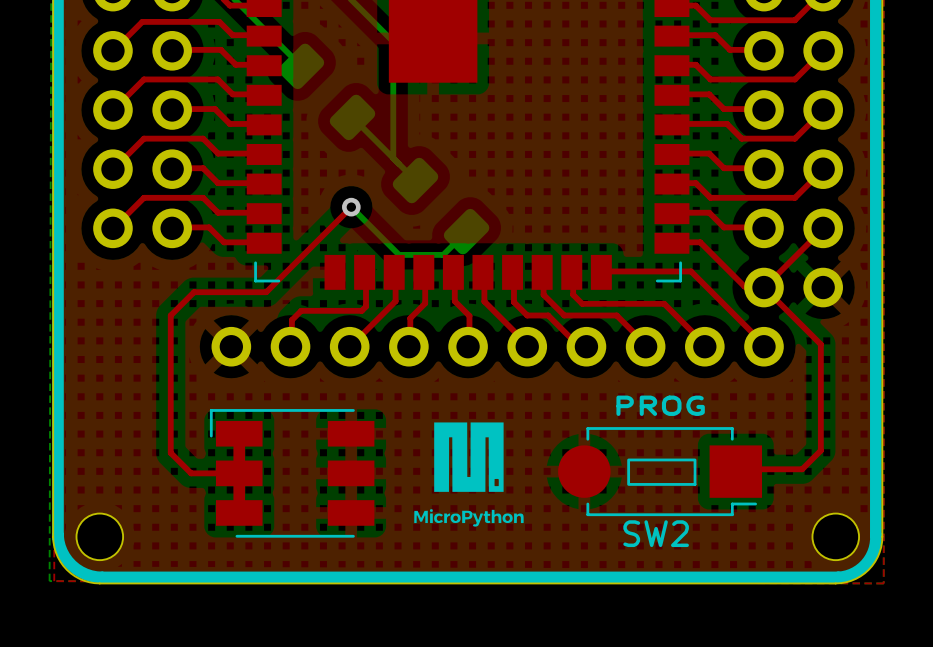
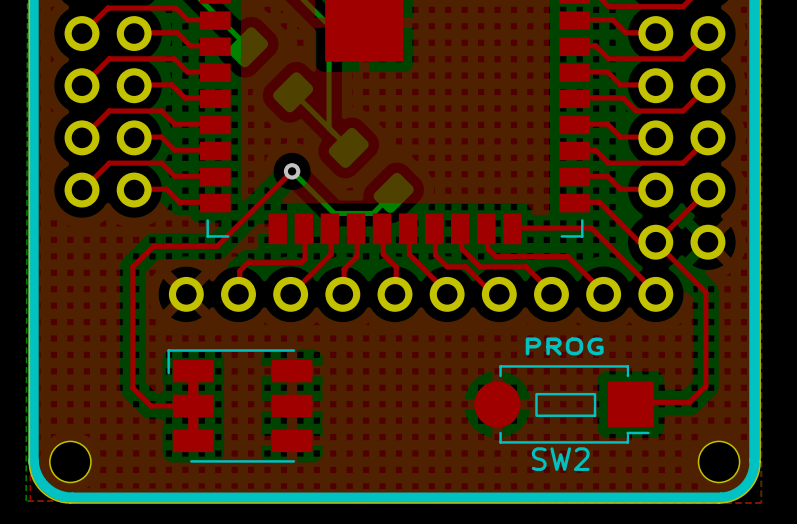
drawing: [414, 422, 524, 527] -> none

